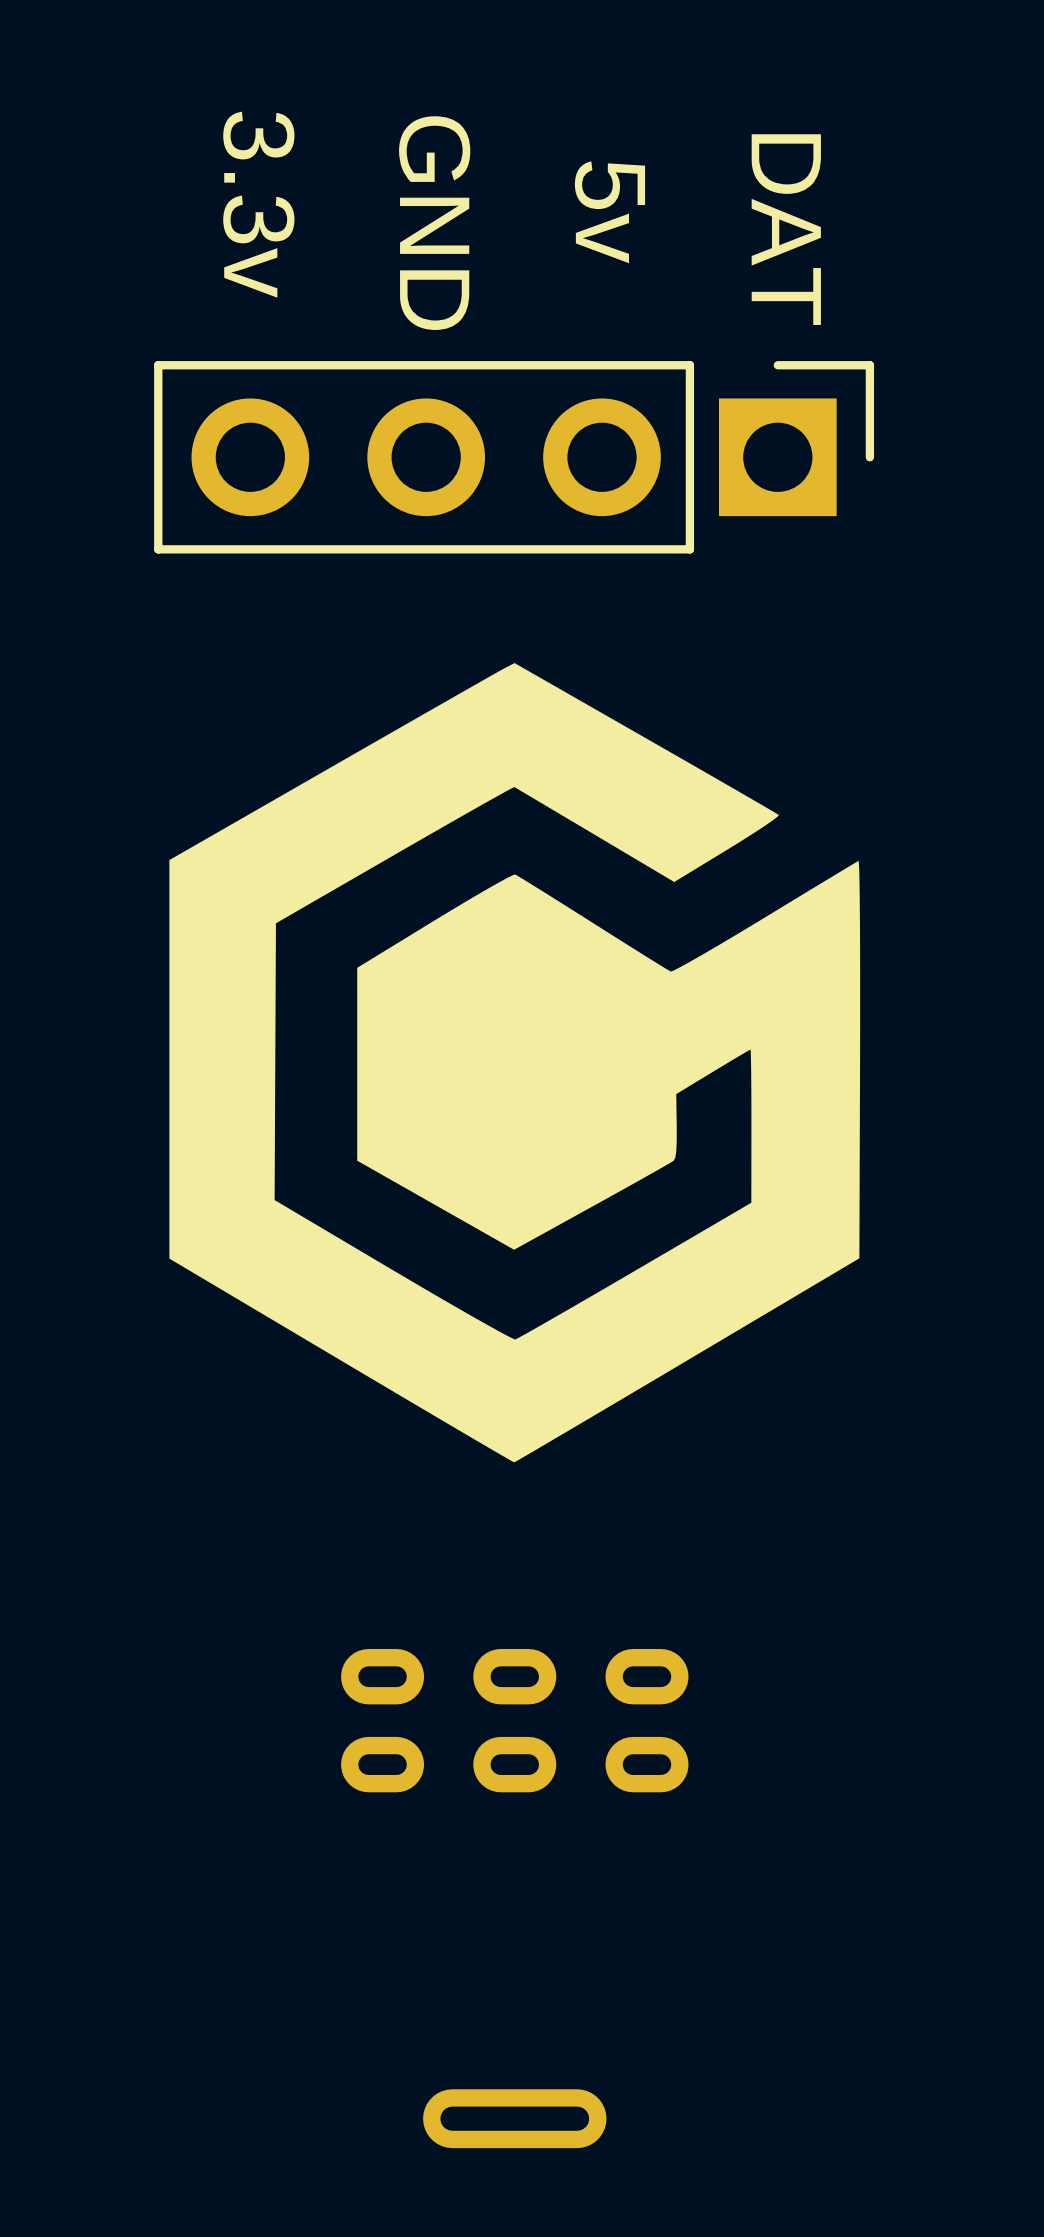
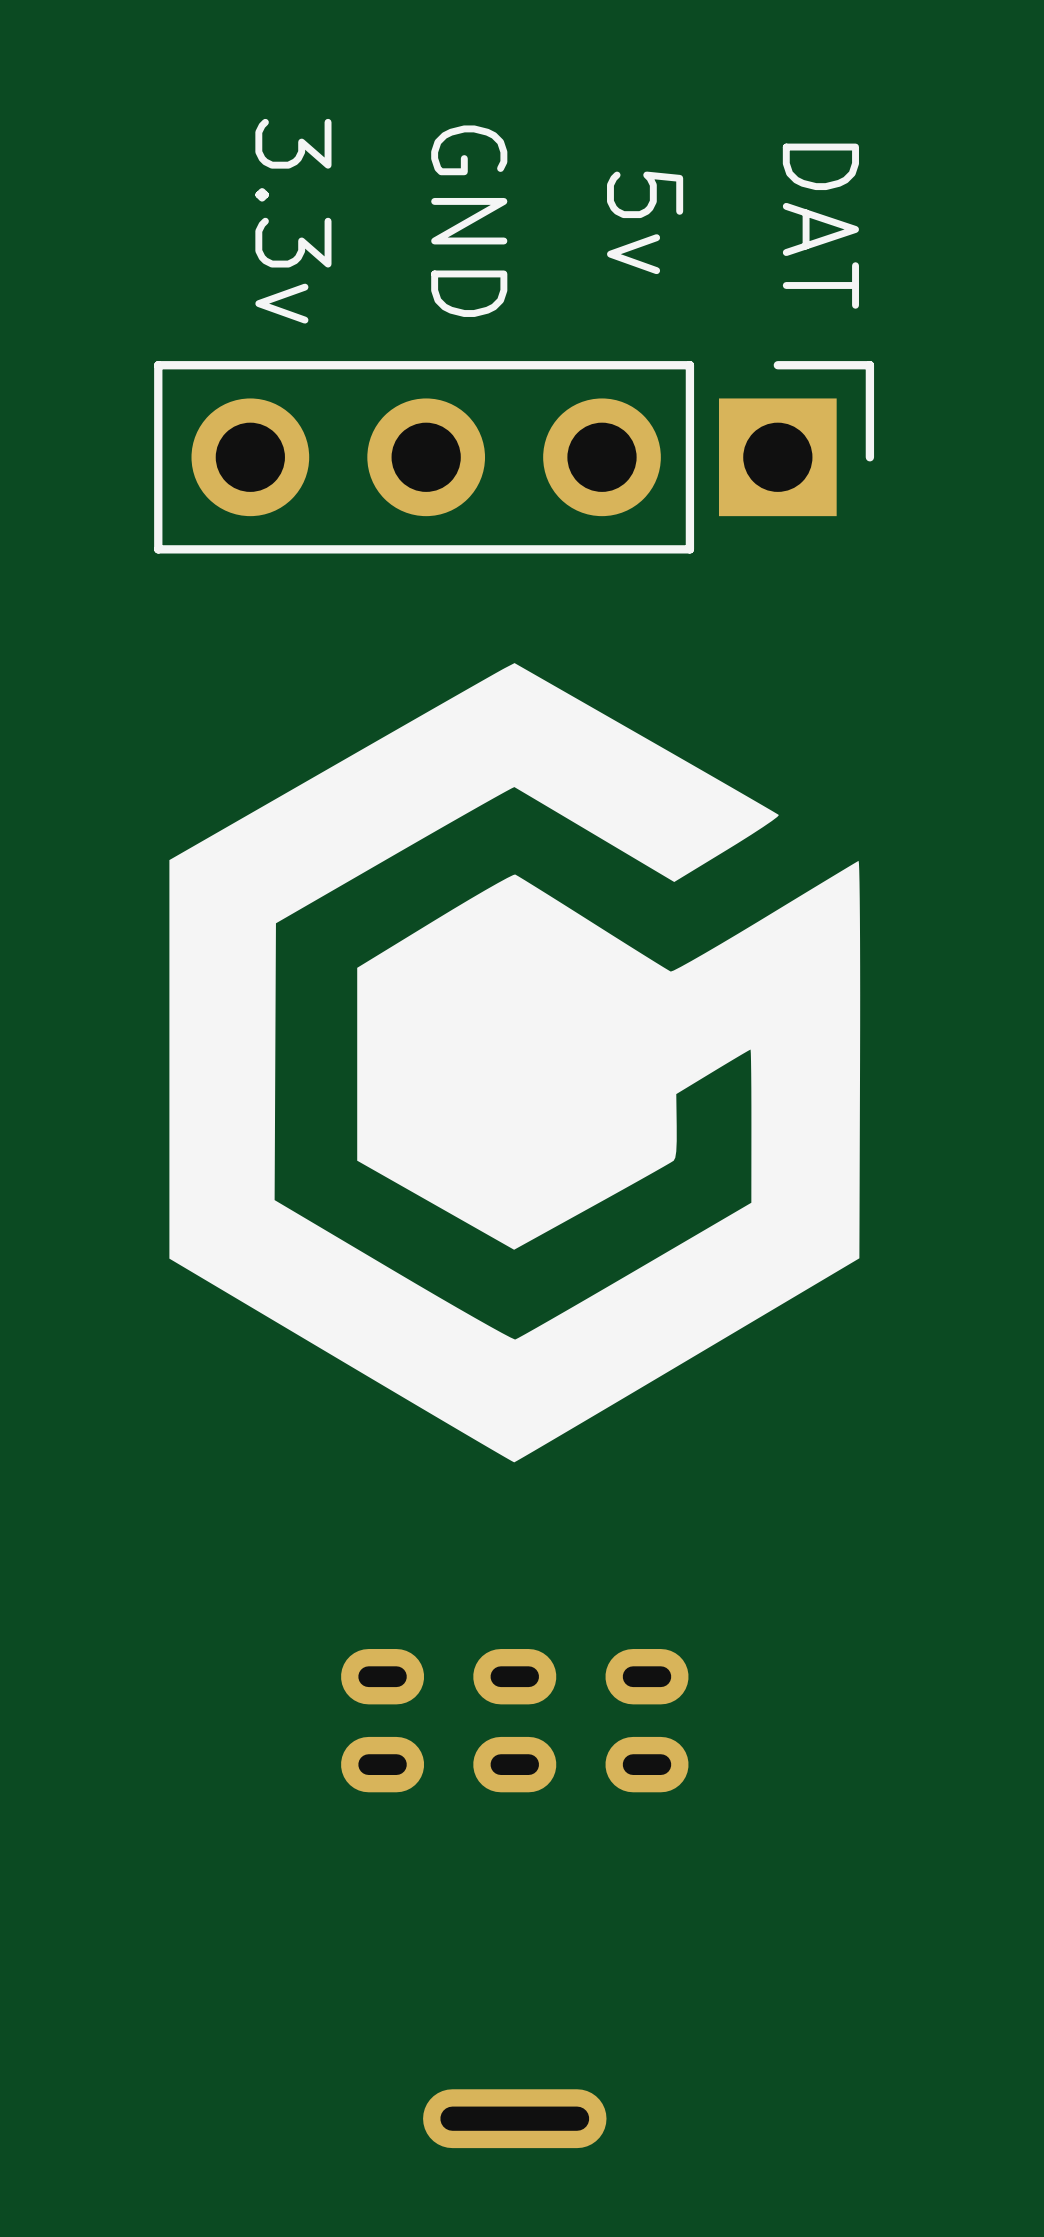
text position: 3.3v (258, 204) -> 3.3v (293, 221)
text position: 5v (609, 212) -> 5v (645, 222)
text position: GND (434, 223) -> GND (469, 221)
text position: DAT (786, 229) -> DAT (820, 226)

